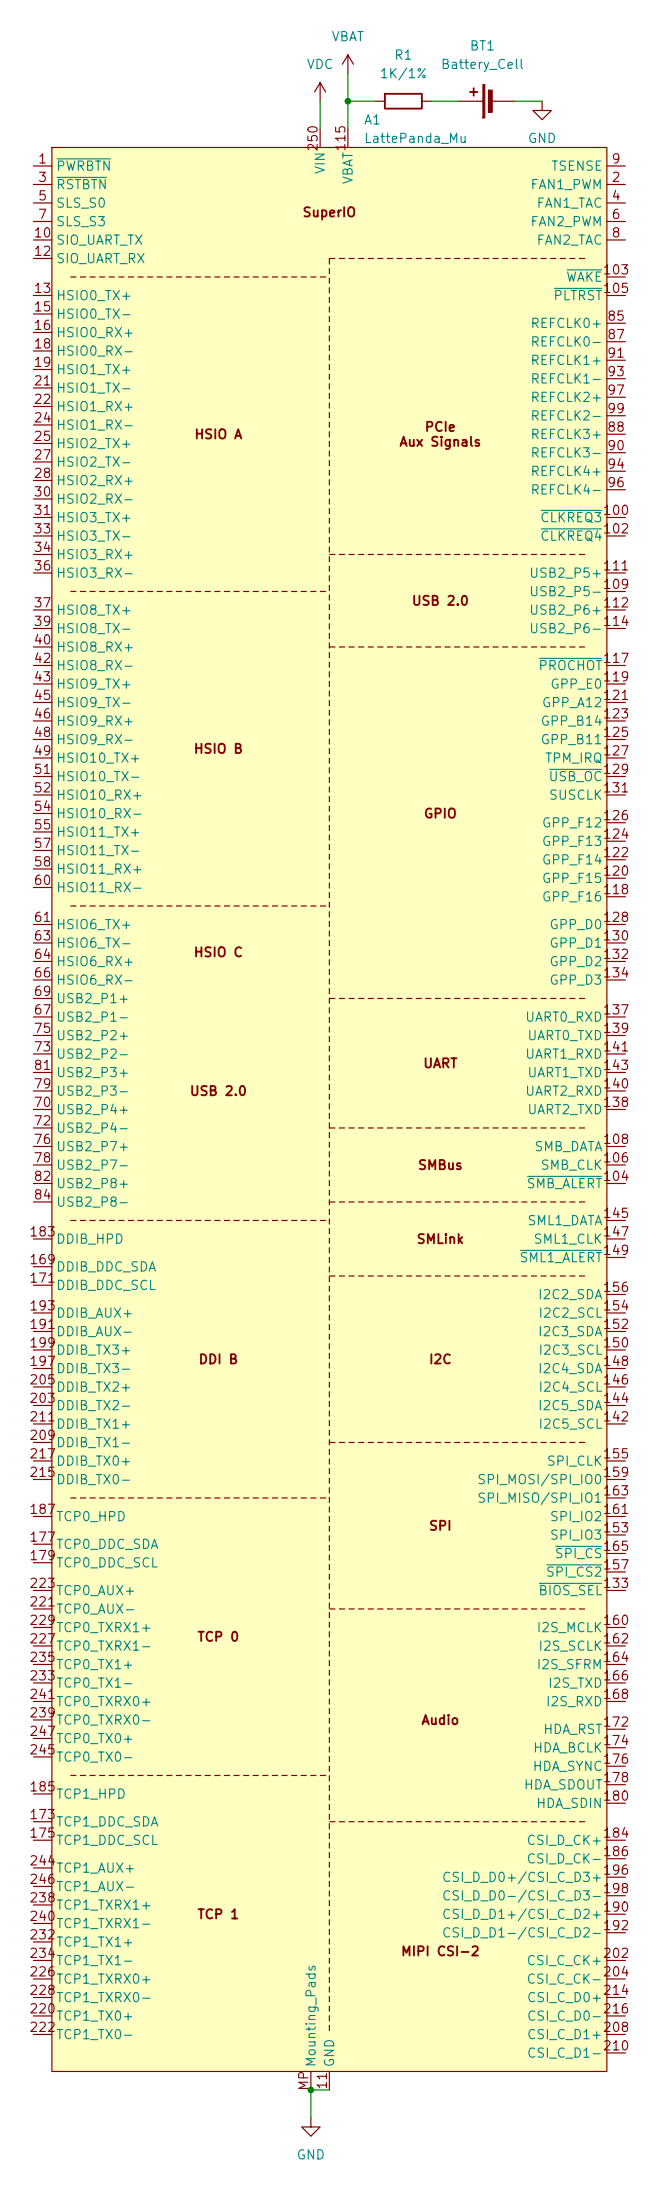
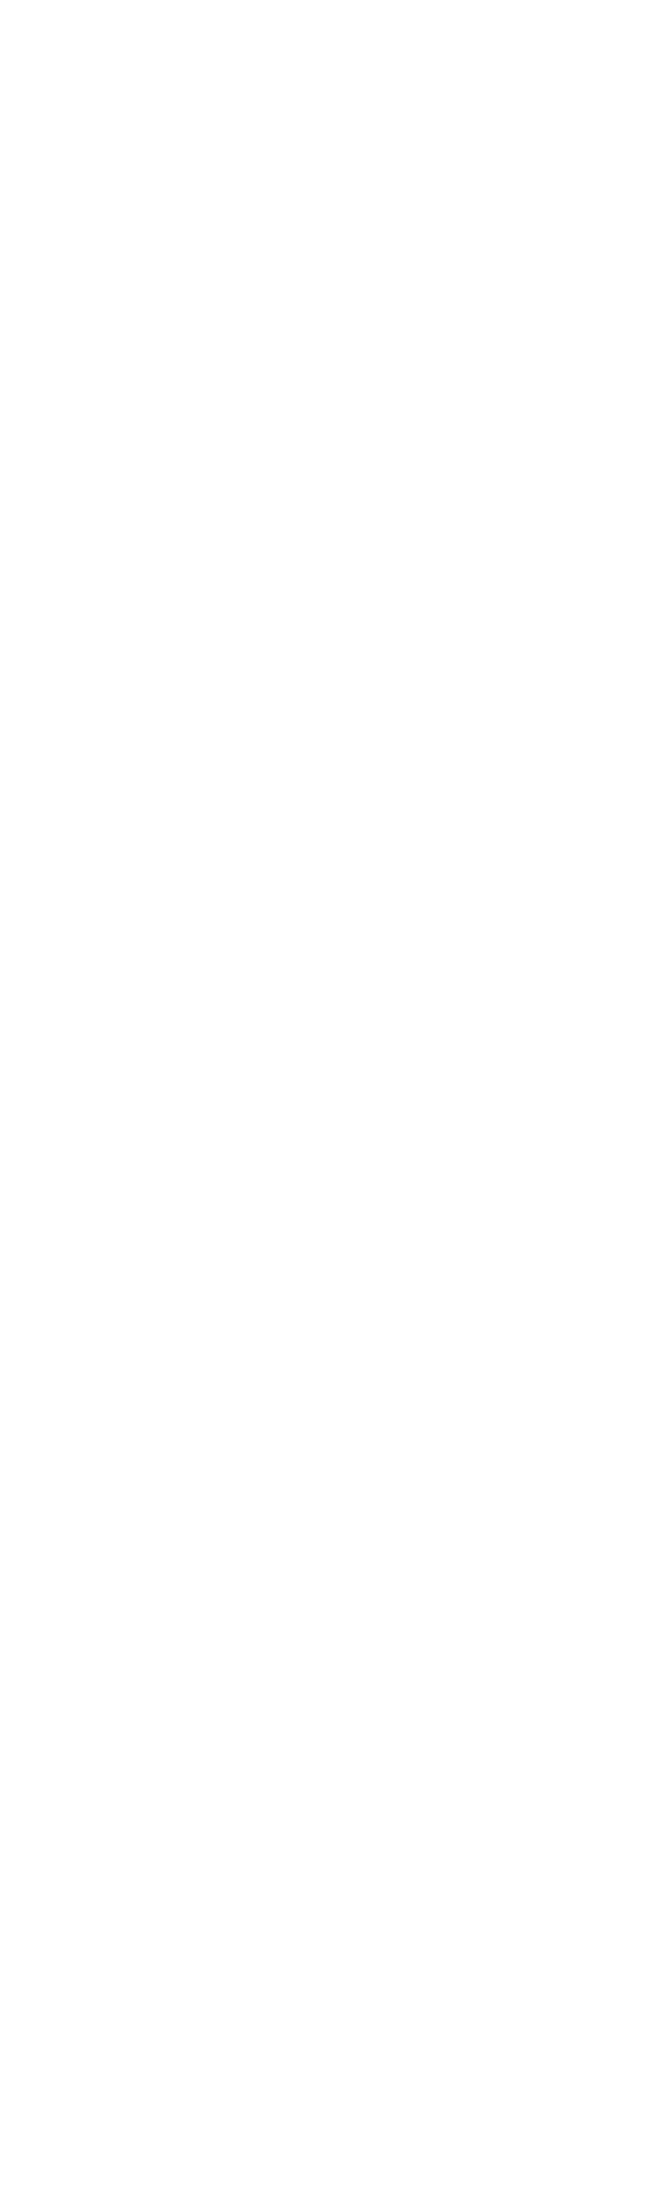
power symbol: VBAT (347, 64) -> none
wire: (347, 73) (347, 128) -> none
power symbol: VDC (320, 91) -> none
wire: (320, 101) (320, 128) -> none
wire: (347, 101) (375, 101) -> none
junction: (347, 101) -> none
R1: 1K/1% (403, 101) -> none
wire: (431, 101) (458, 101) -> none
BT1: Battery_Cell (486, 101) -> none
wire: (514, 101) (542, 101) -> none
power symbol: GND (542, 110) -> none
A1: LattePanda_Mu (329, 1109) -> none
junction: (310, 2089) -> none
wire: (329, 2089) (310, 2089) (310, 2117) -> none
power symbol: GND (310, 2126) -> none

